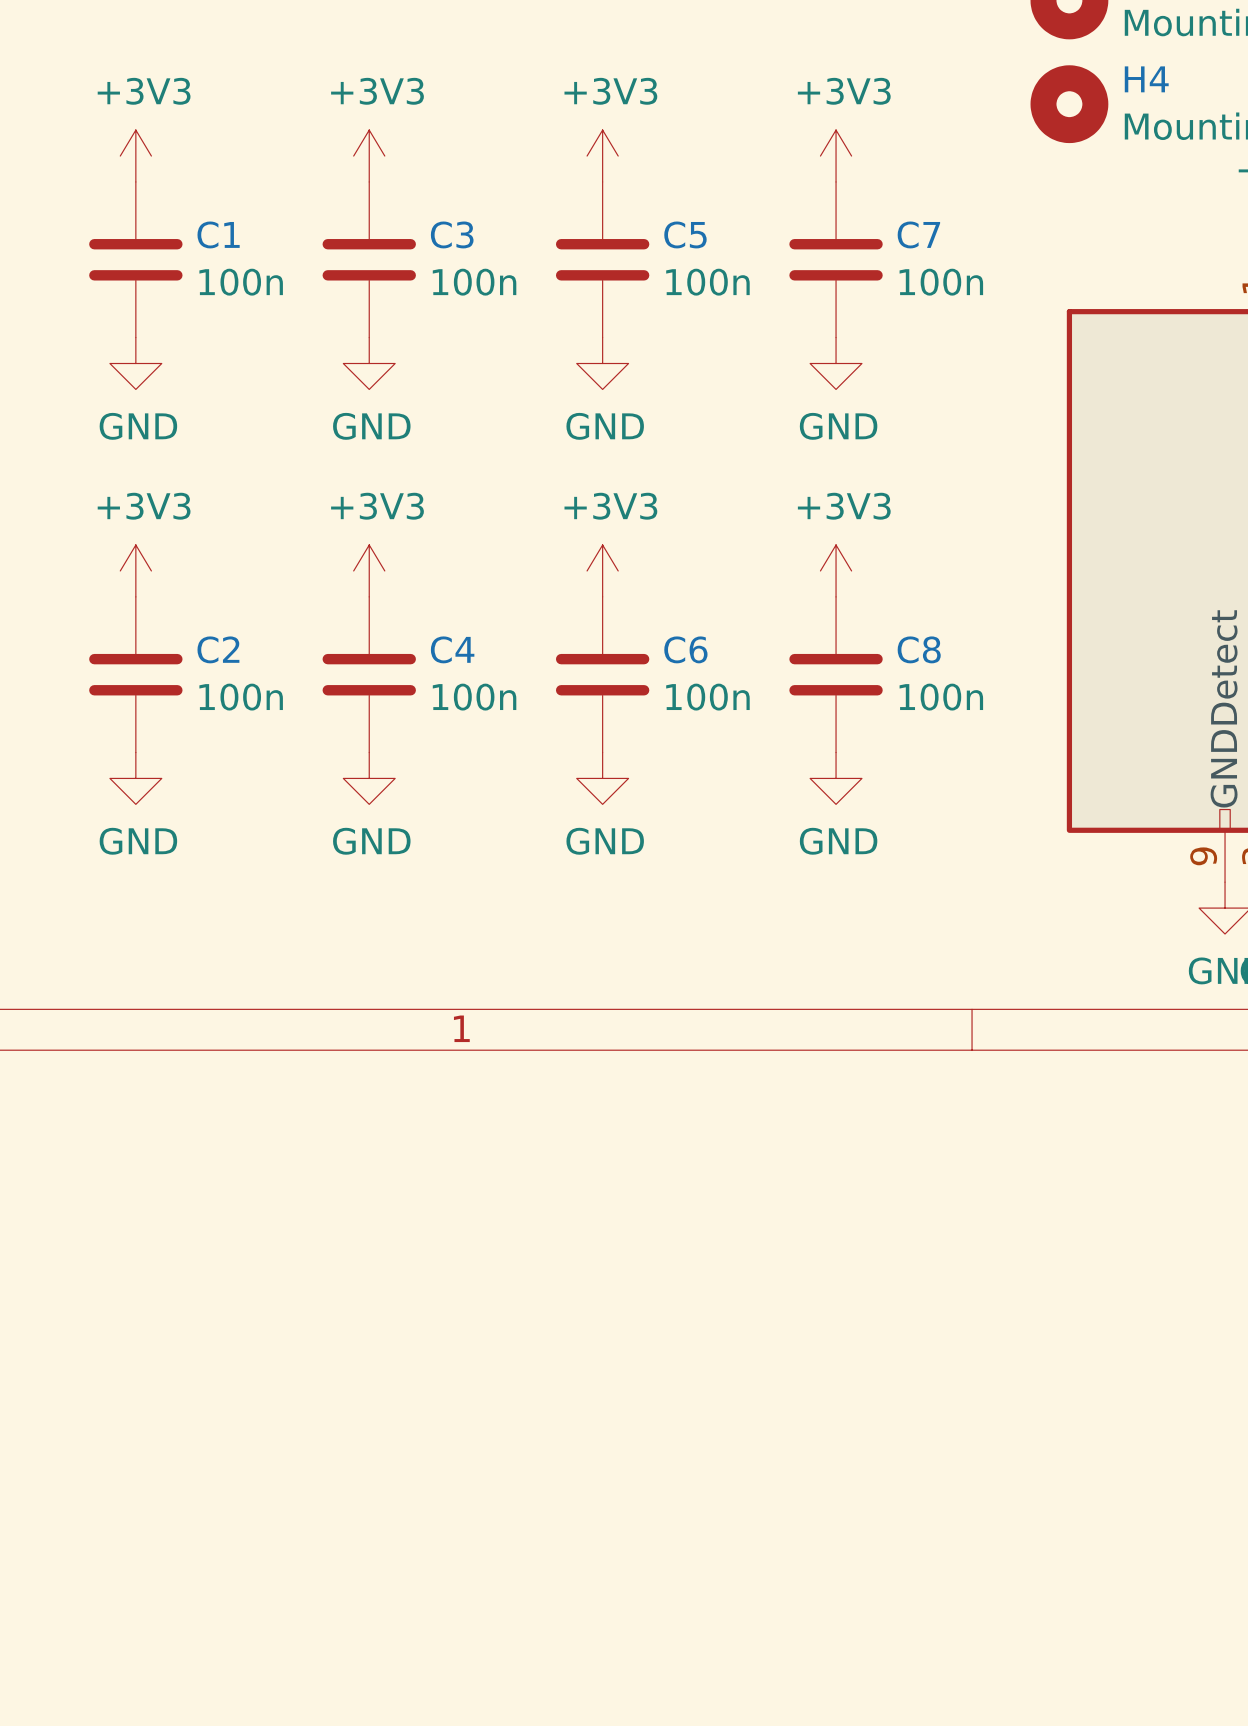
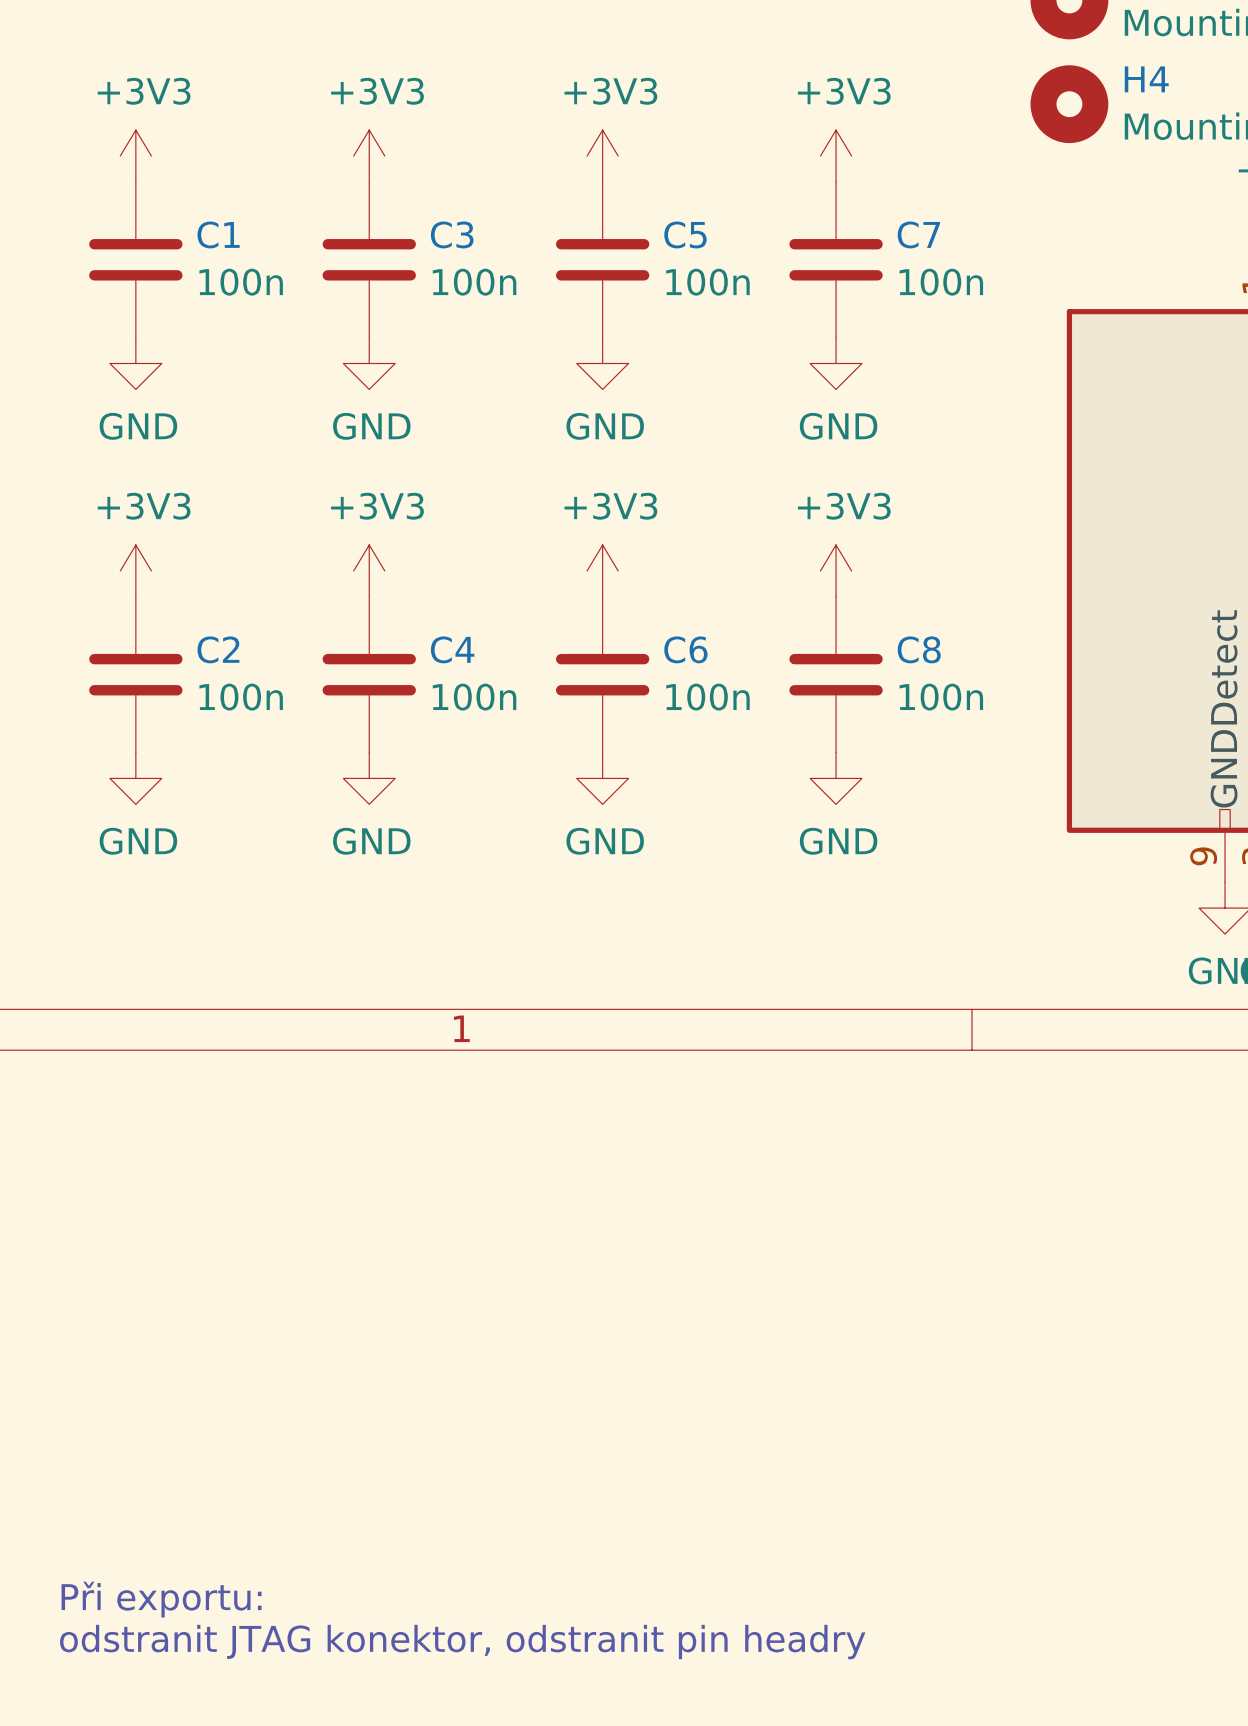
text: none -> Při exportu: (161, 1599)
text: none -> odstranit JTAG konektor, odstranit pin headry (462, 1642)

